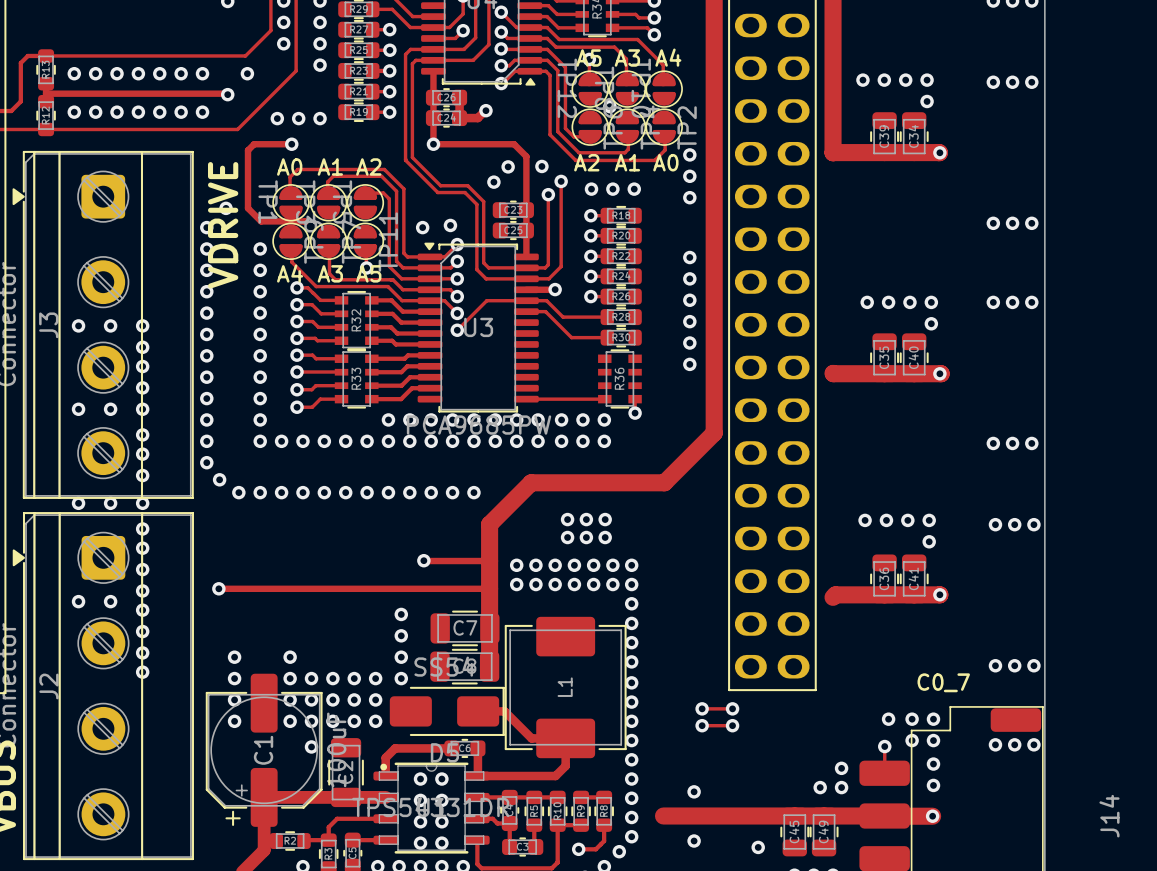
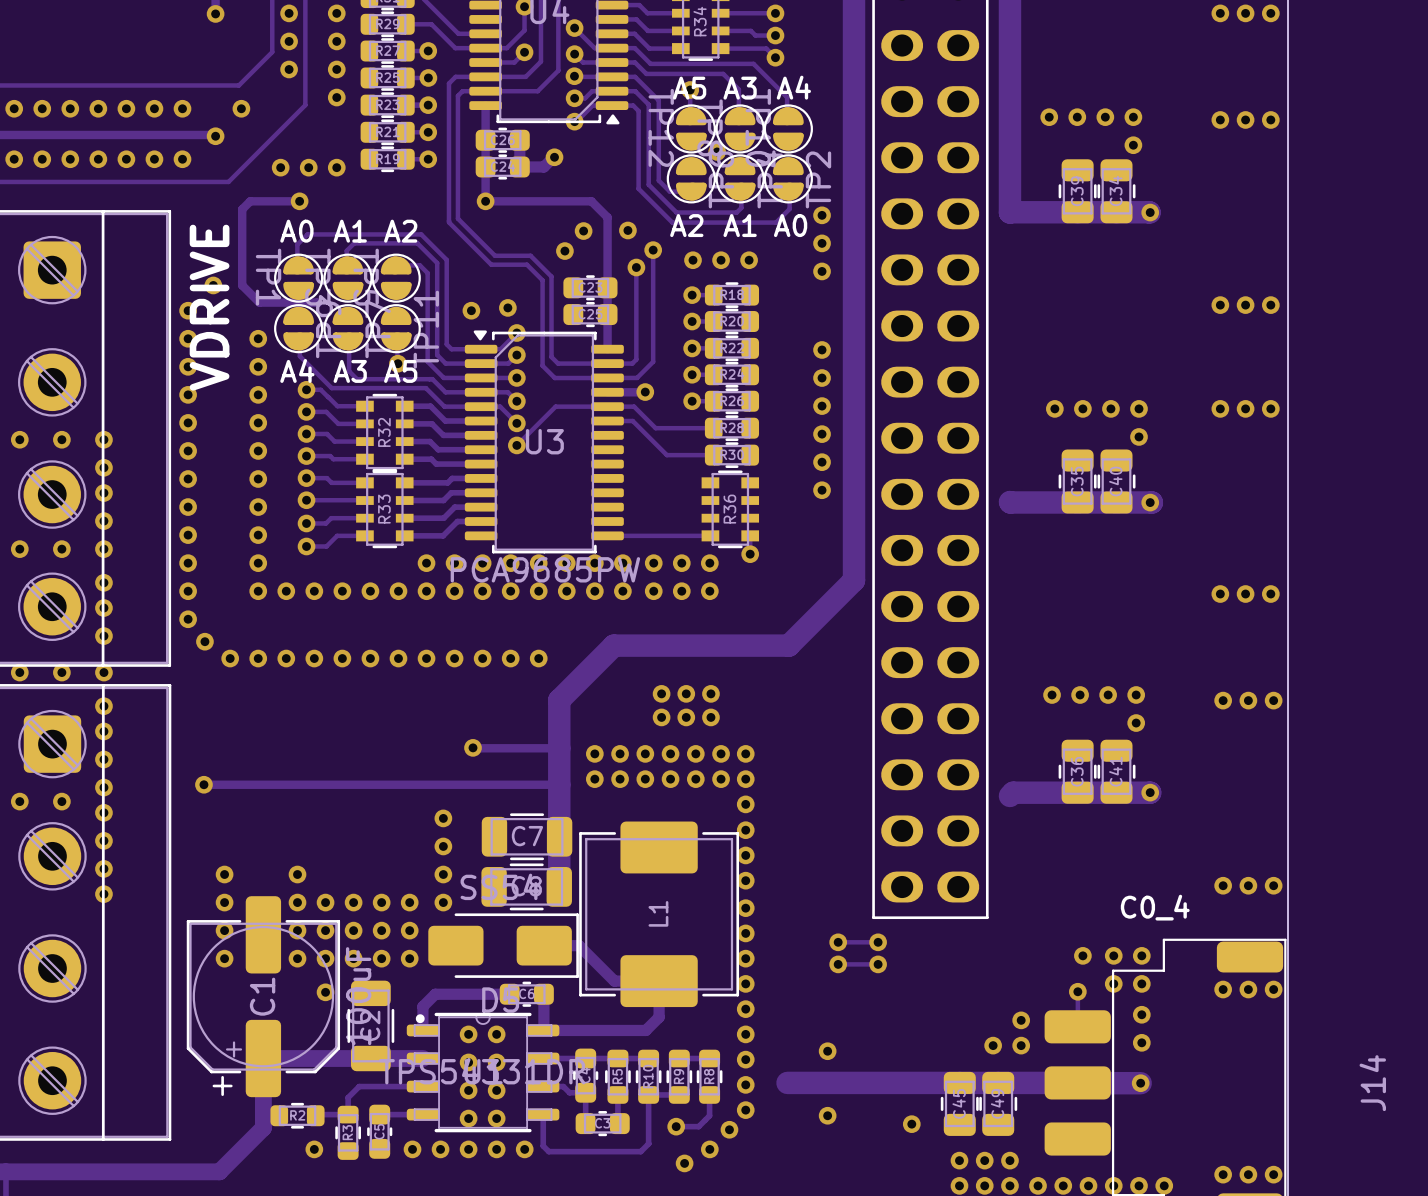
text: C0_7 (943, 682) -> C0_4 (1155, 907)

